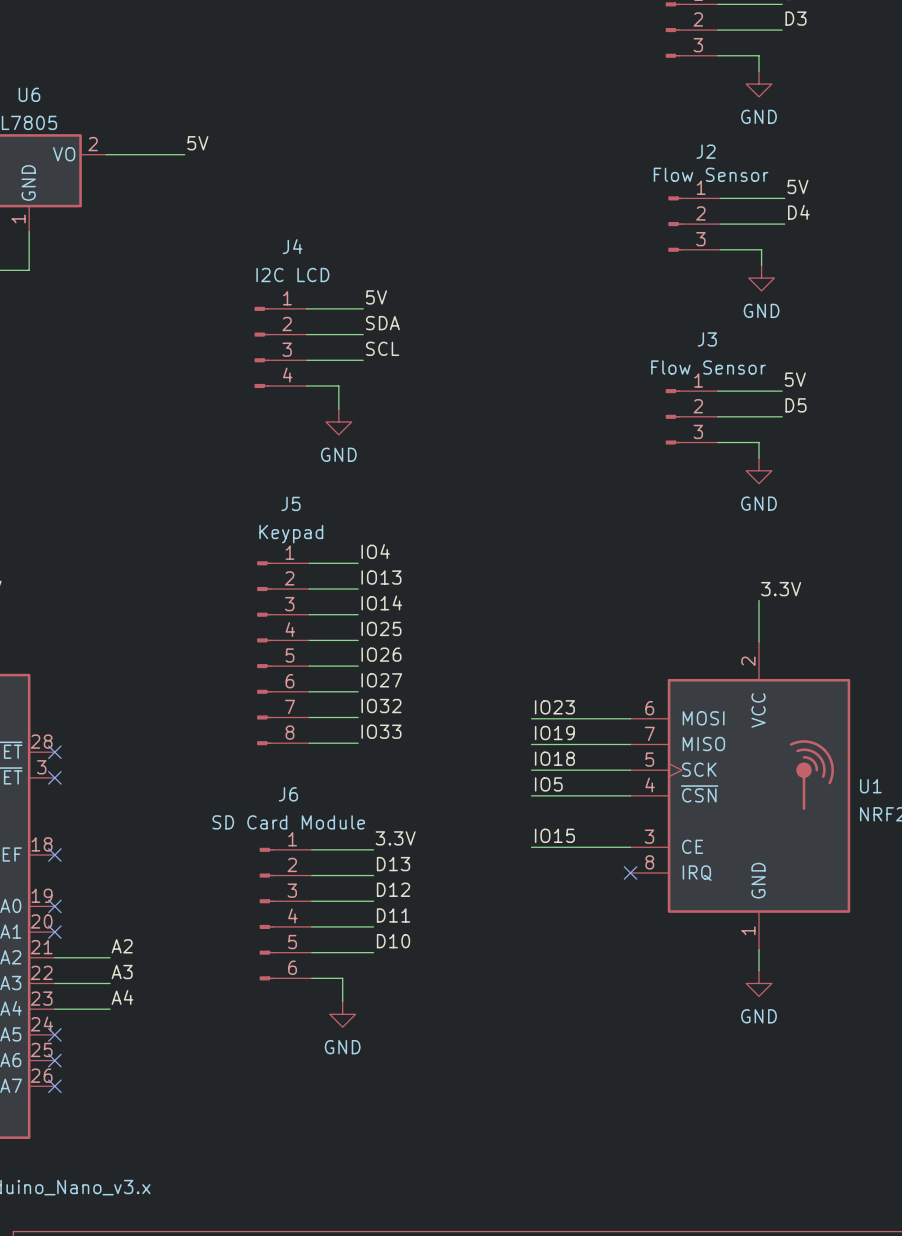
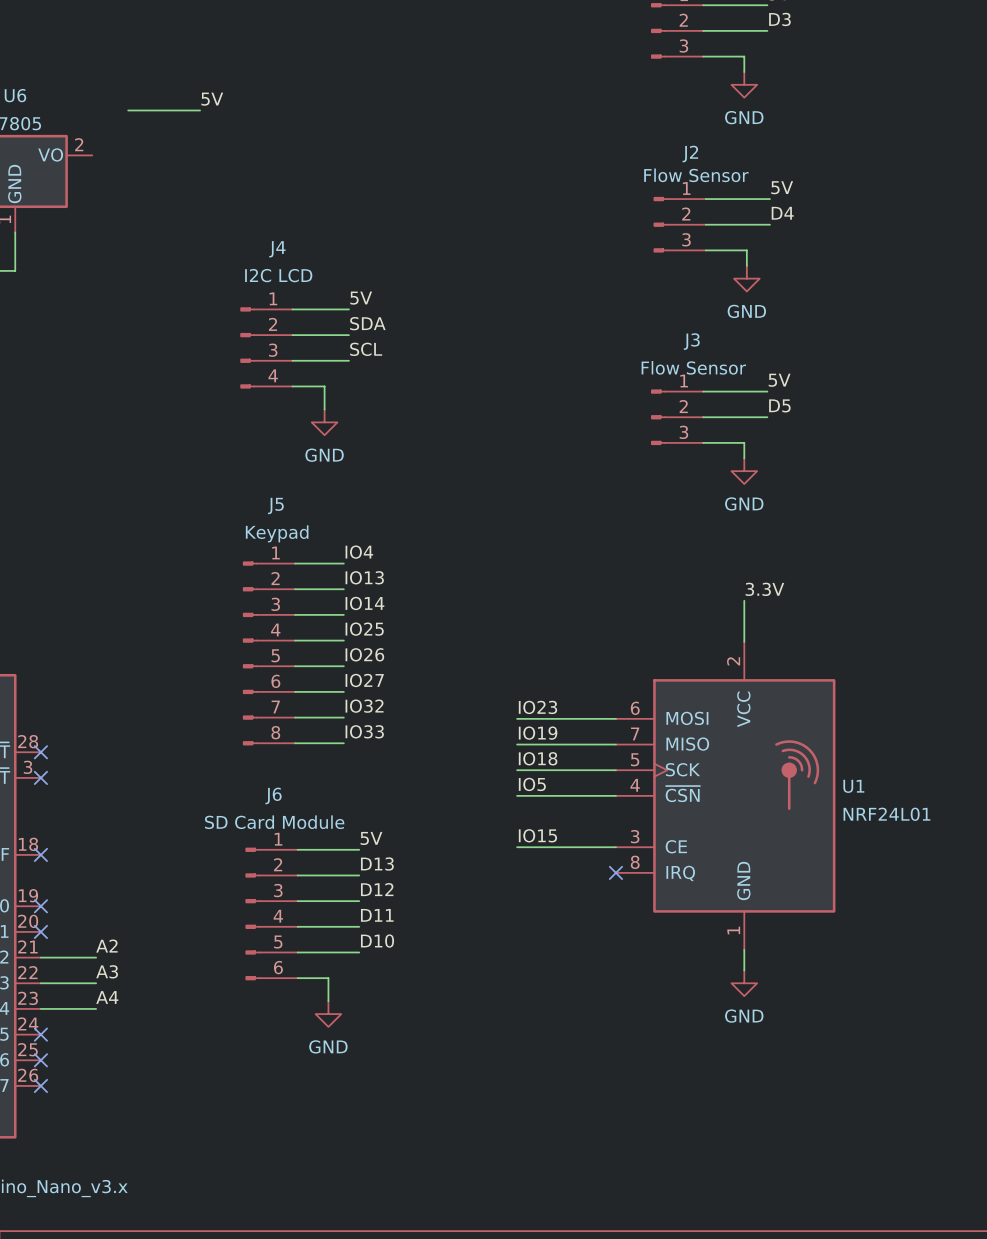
wire: none -> (128, 110) (200, 110)
label position: 5V (197, 143) -> 5V (212, 99)
wire: (106, 154) (184, 154) -> none
label: 3.3V (395, 838) -> 5V (371, 838)

